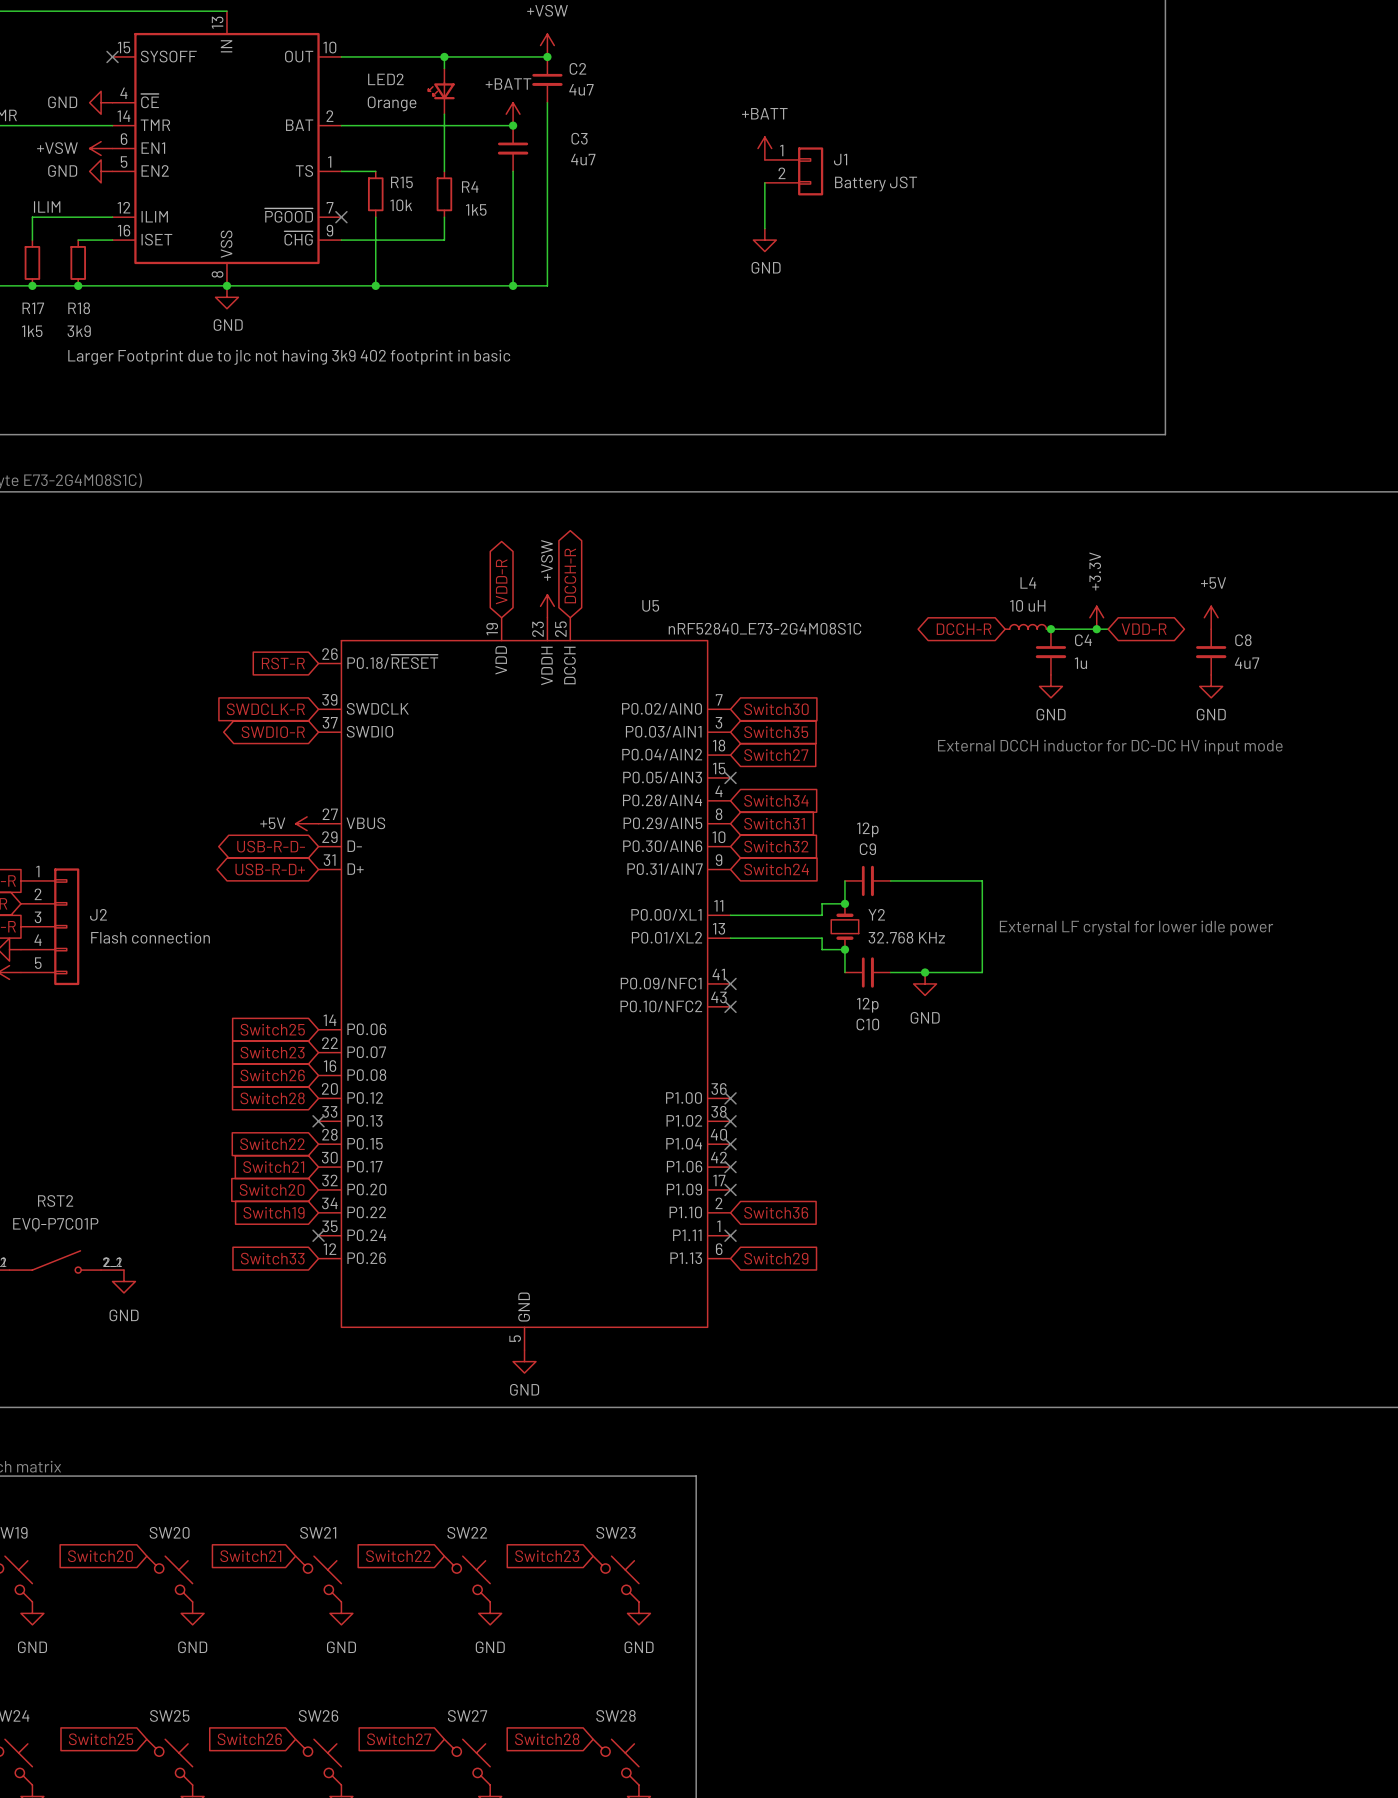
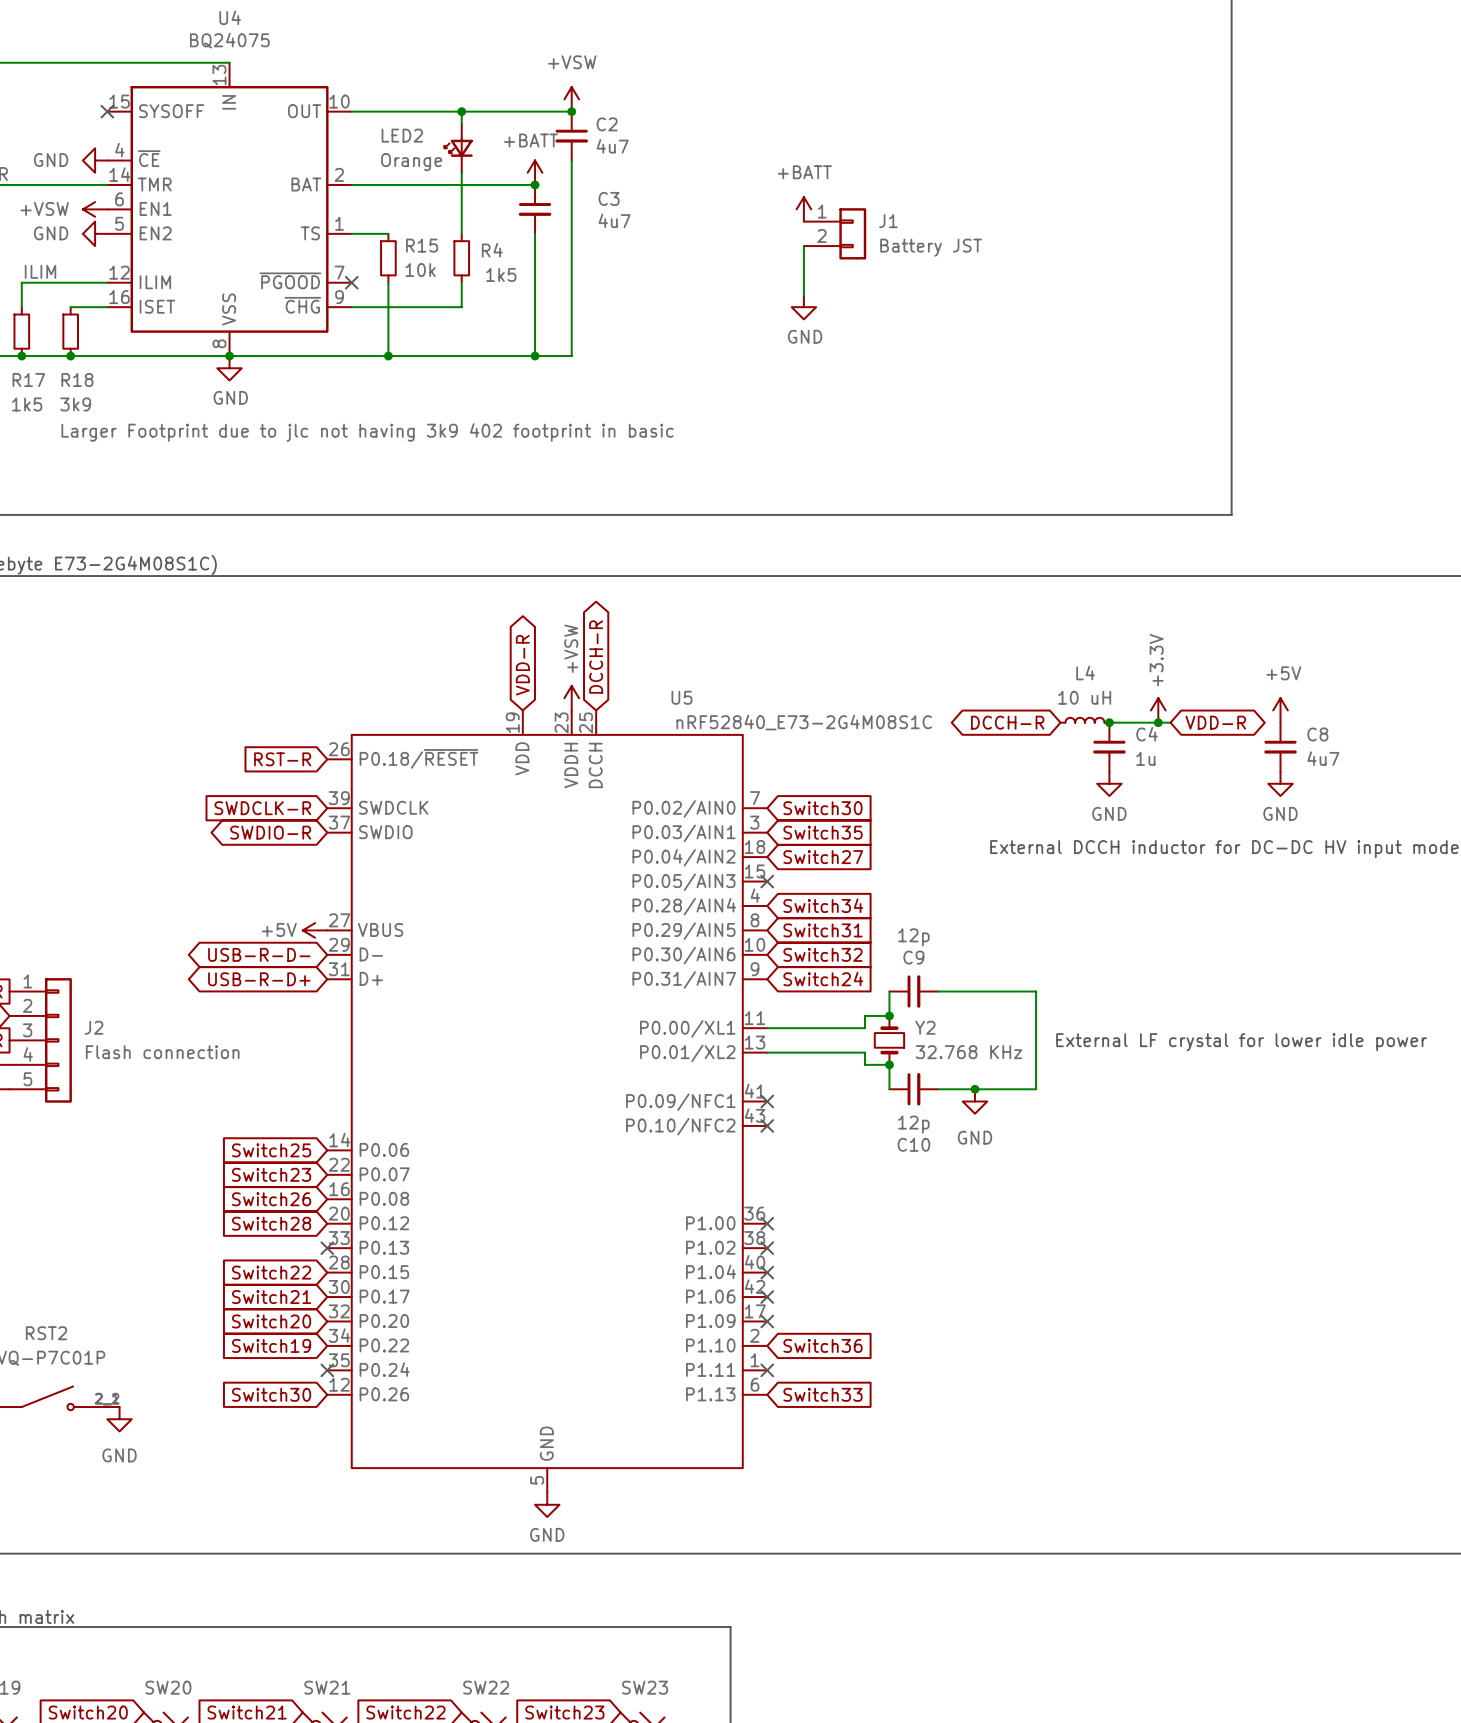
global label: Switch33 (272, 1258) -> Switch30 (271, 1394)
global label: Switch29 (776, 1258) -> Switch33 (822, 1394)

